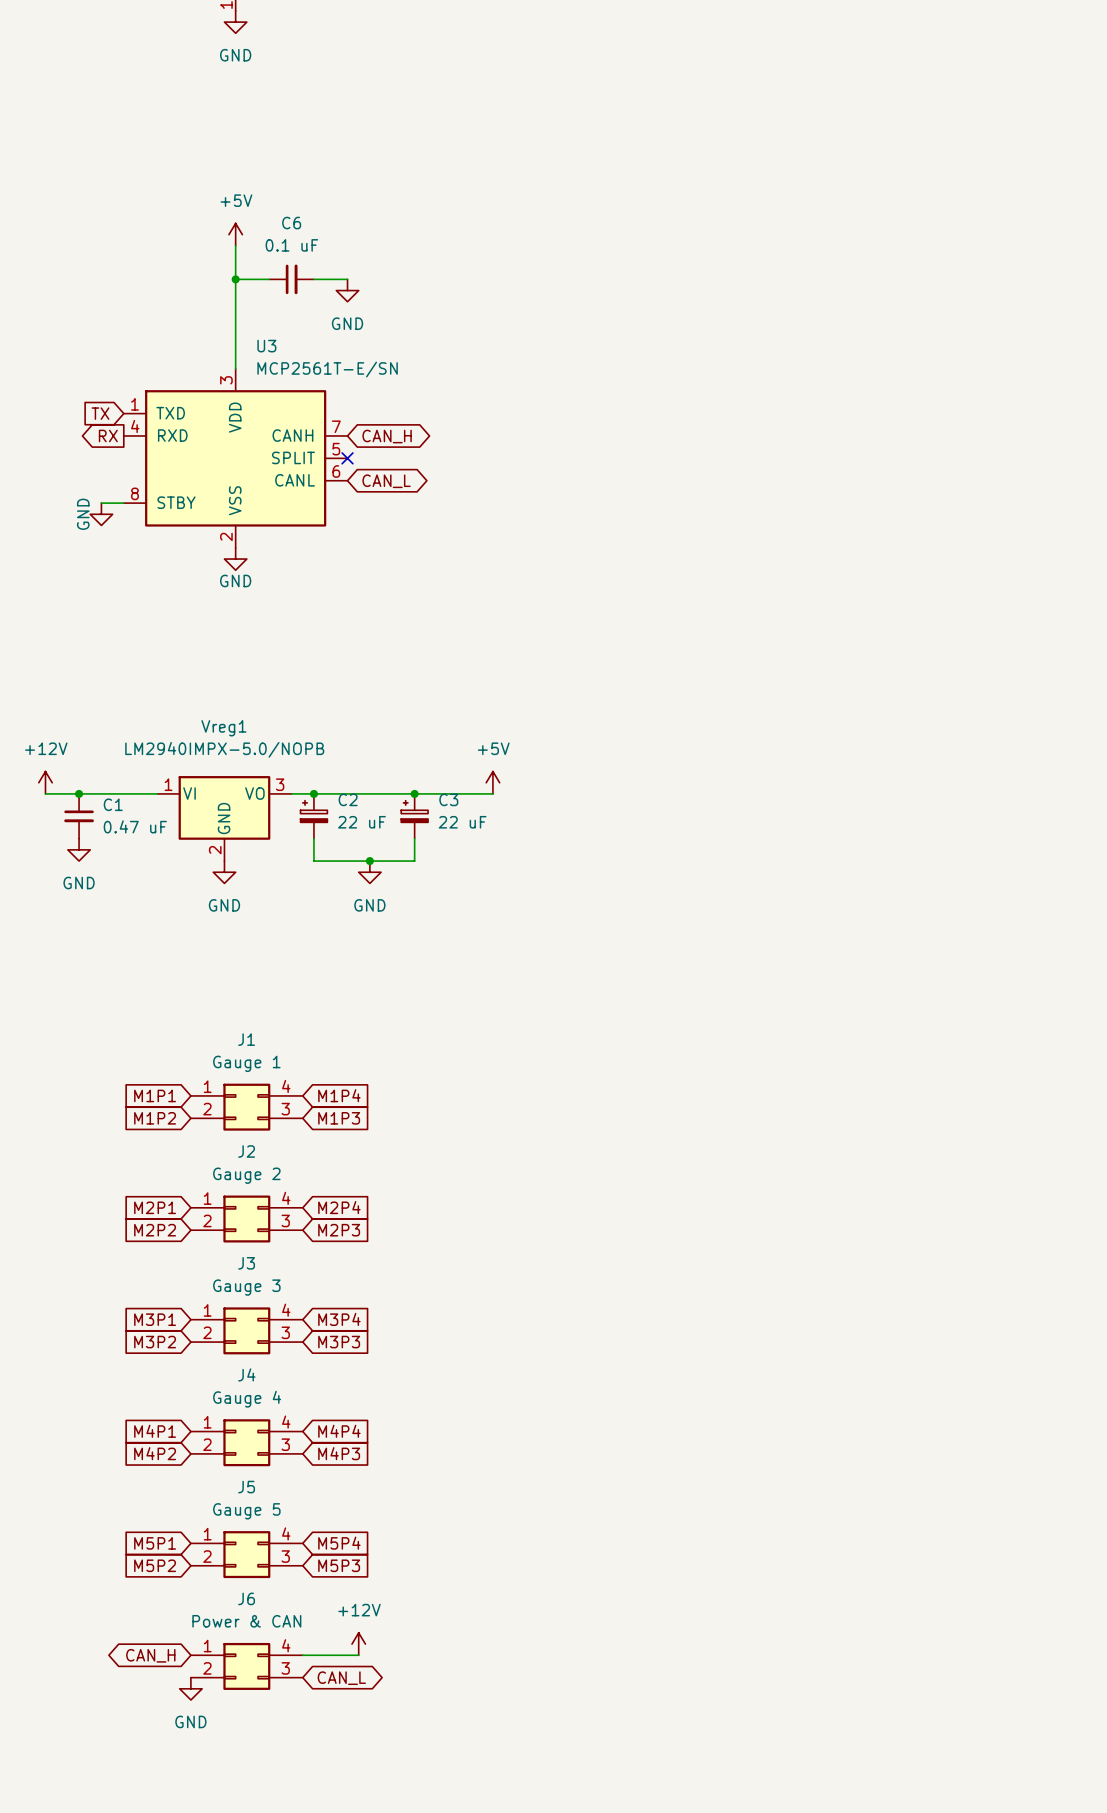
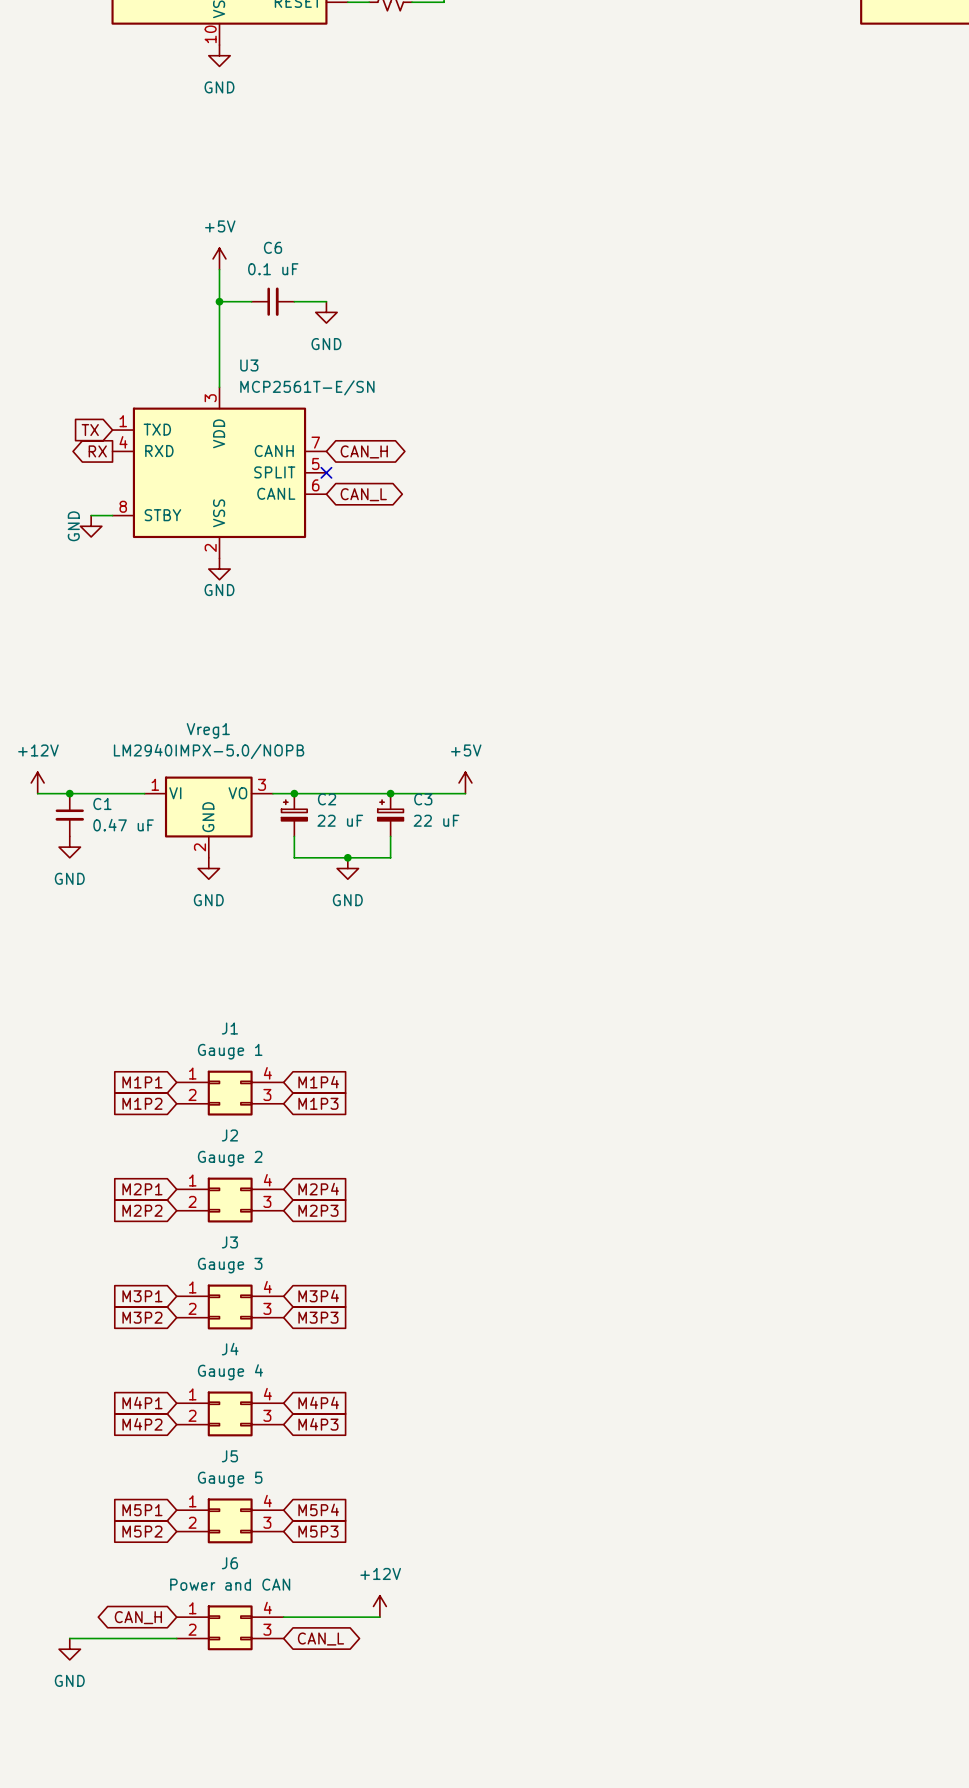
J6 value: Power & CAN (246, 1621) -> Power and CAN (230, 1584)
power symbol position: +12V (358, 1644) -> +12V (379, 1606)
wire: none -> (337, 1617) (379, 1617)
wire: none -> (69, 1638) (176, 1638)
power symbol position: GND (190, 1688) -> GND (69, 1649)

